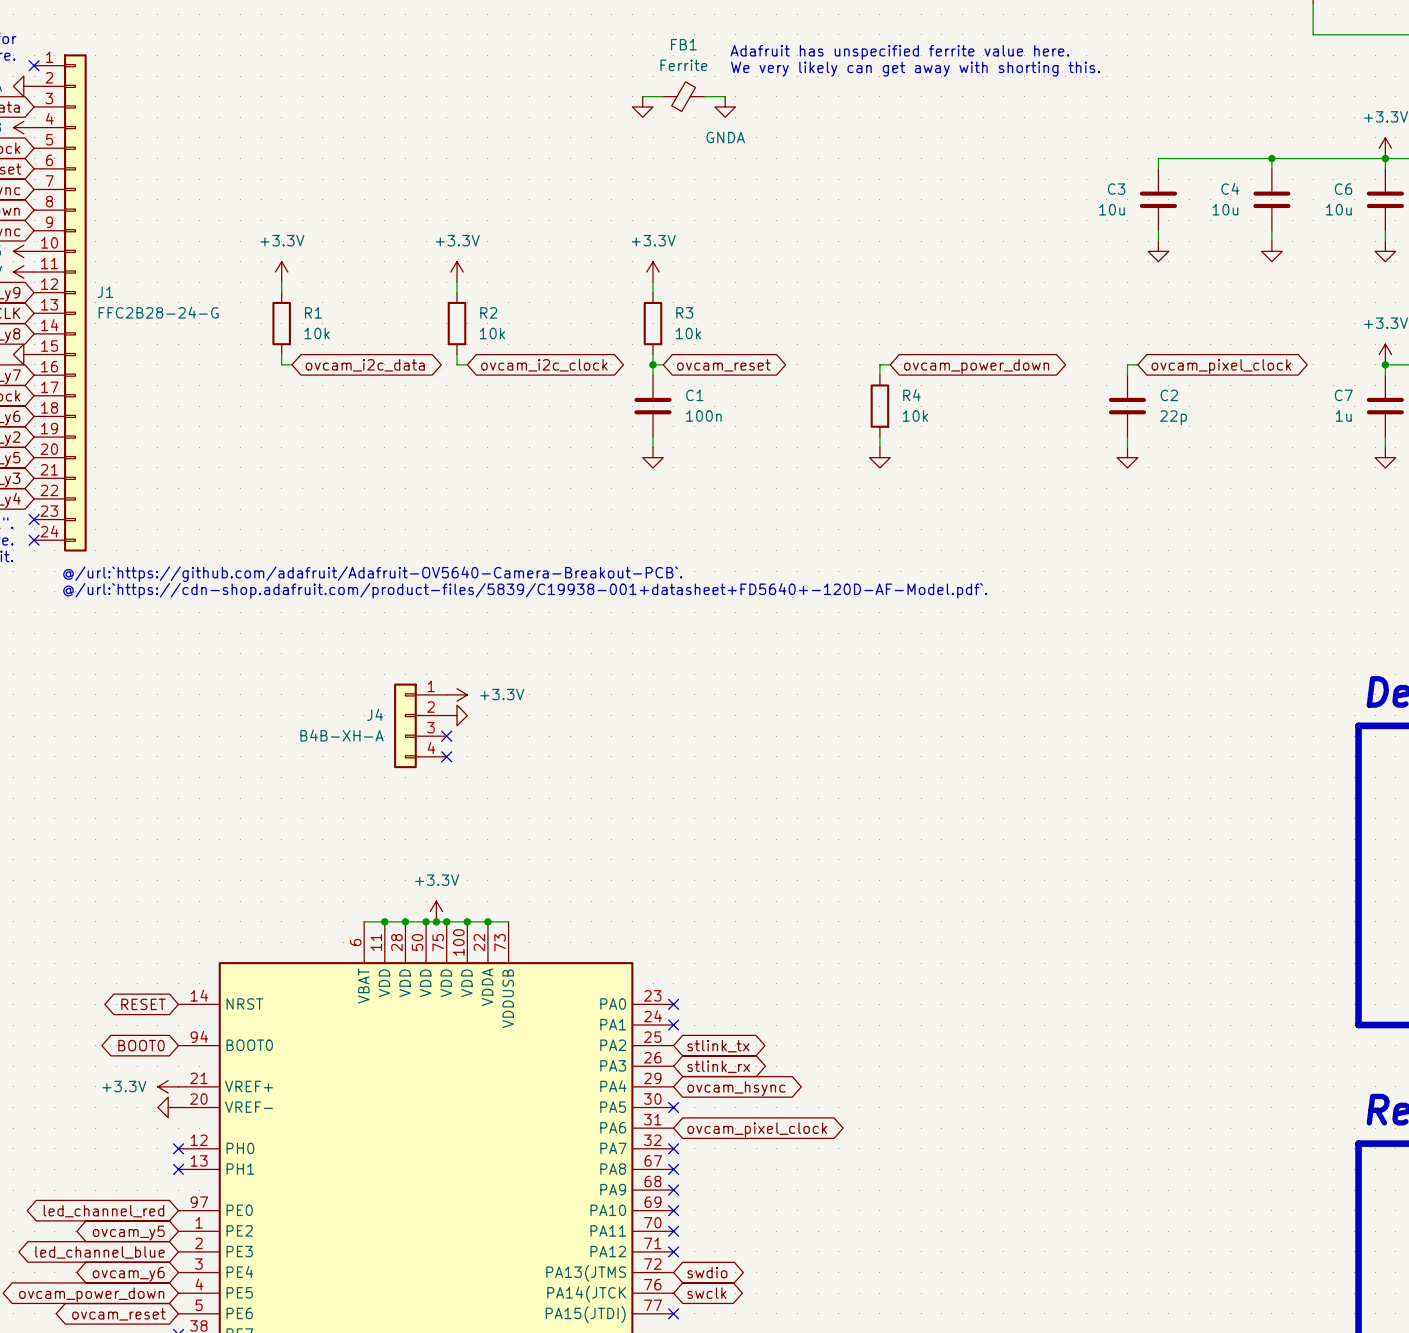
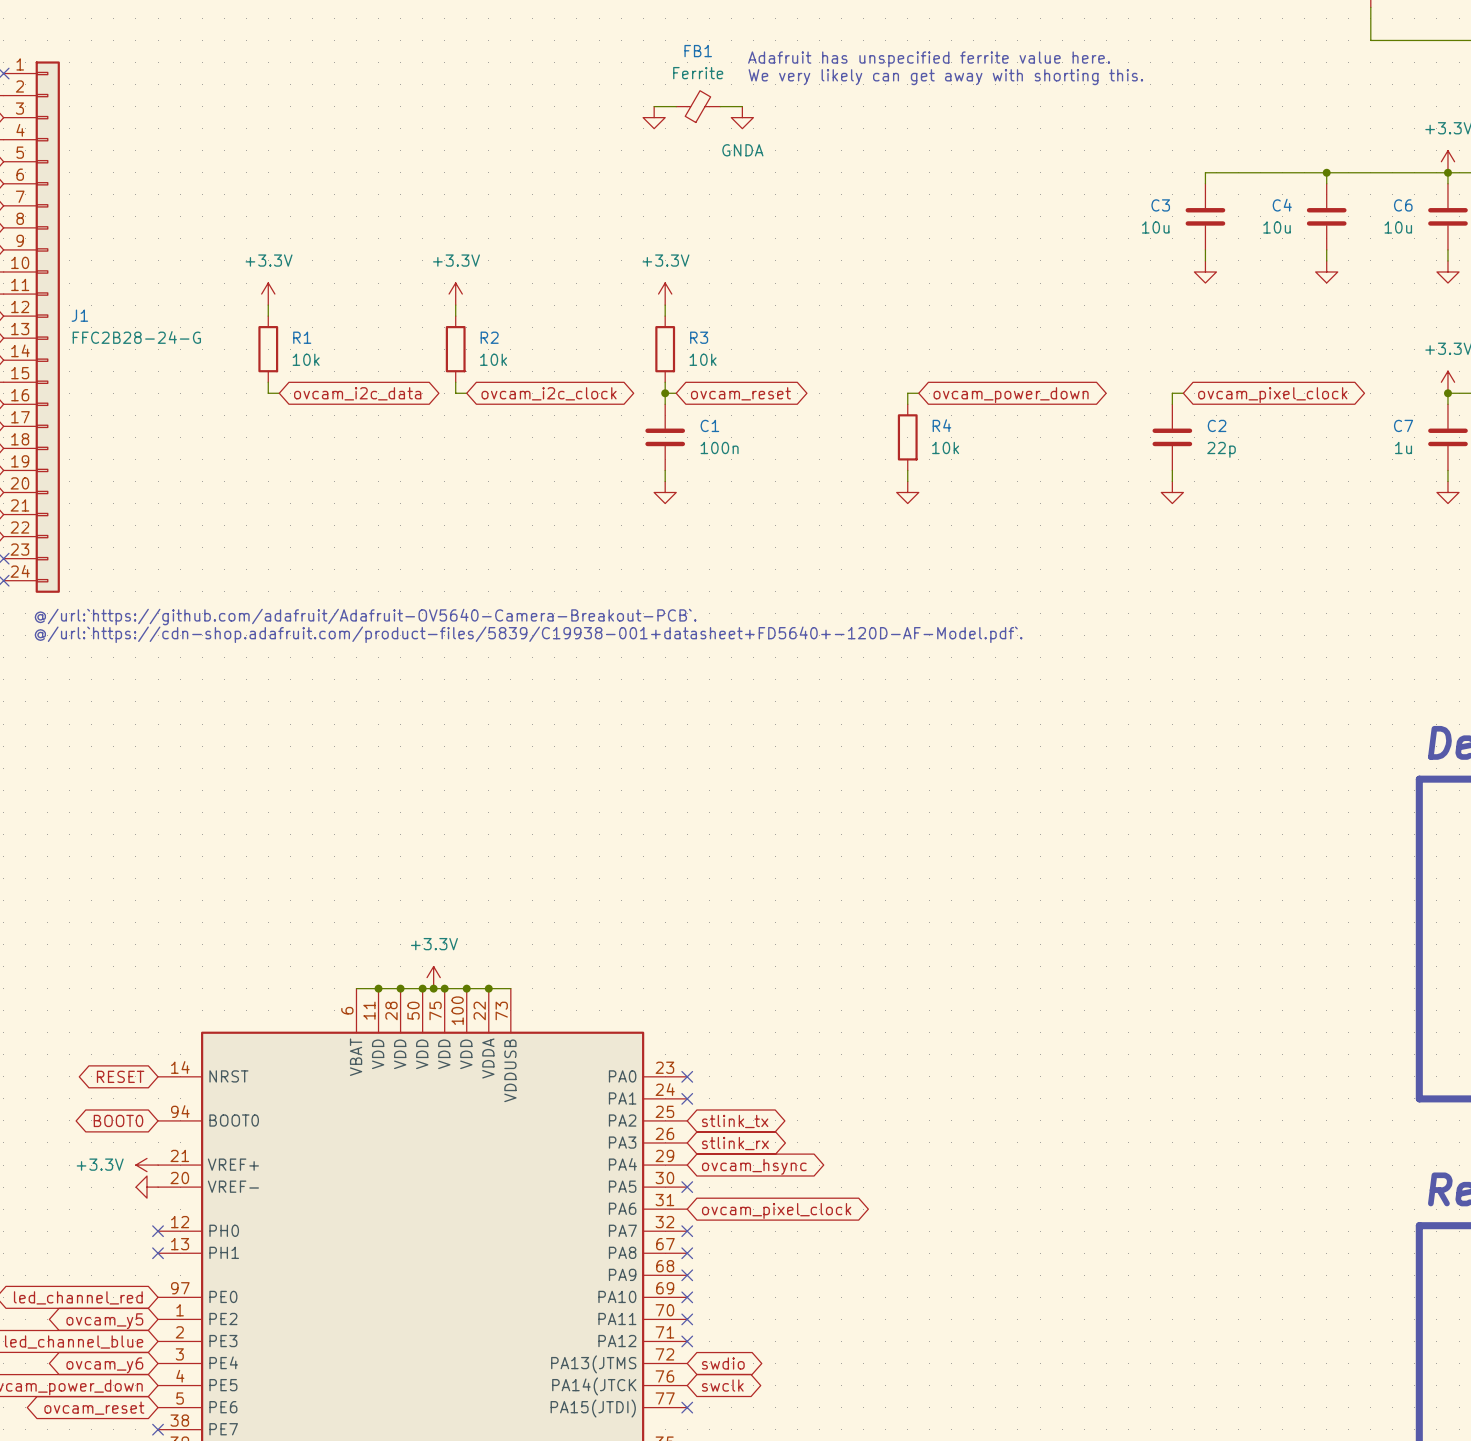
power symbol: +3.3V (457, 694) -> none
power symbol: (457, 715) -> none
J4: B4B-XH-A (420, 725) -> none
no-connect mark: (446, 736) -> none
no-connect mark: (446, 756) -> none

